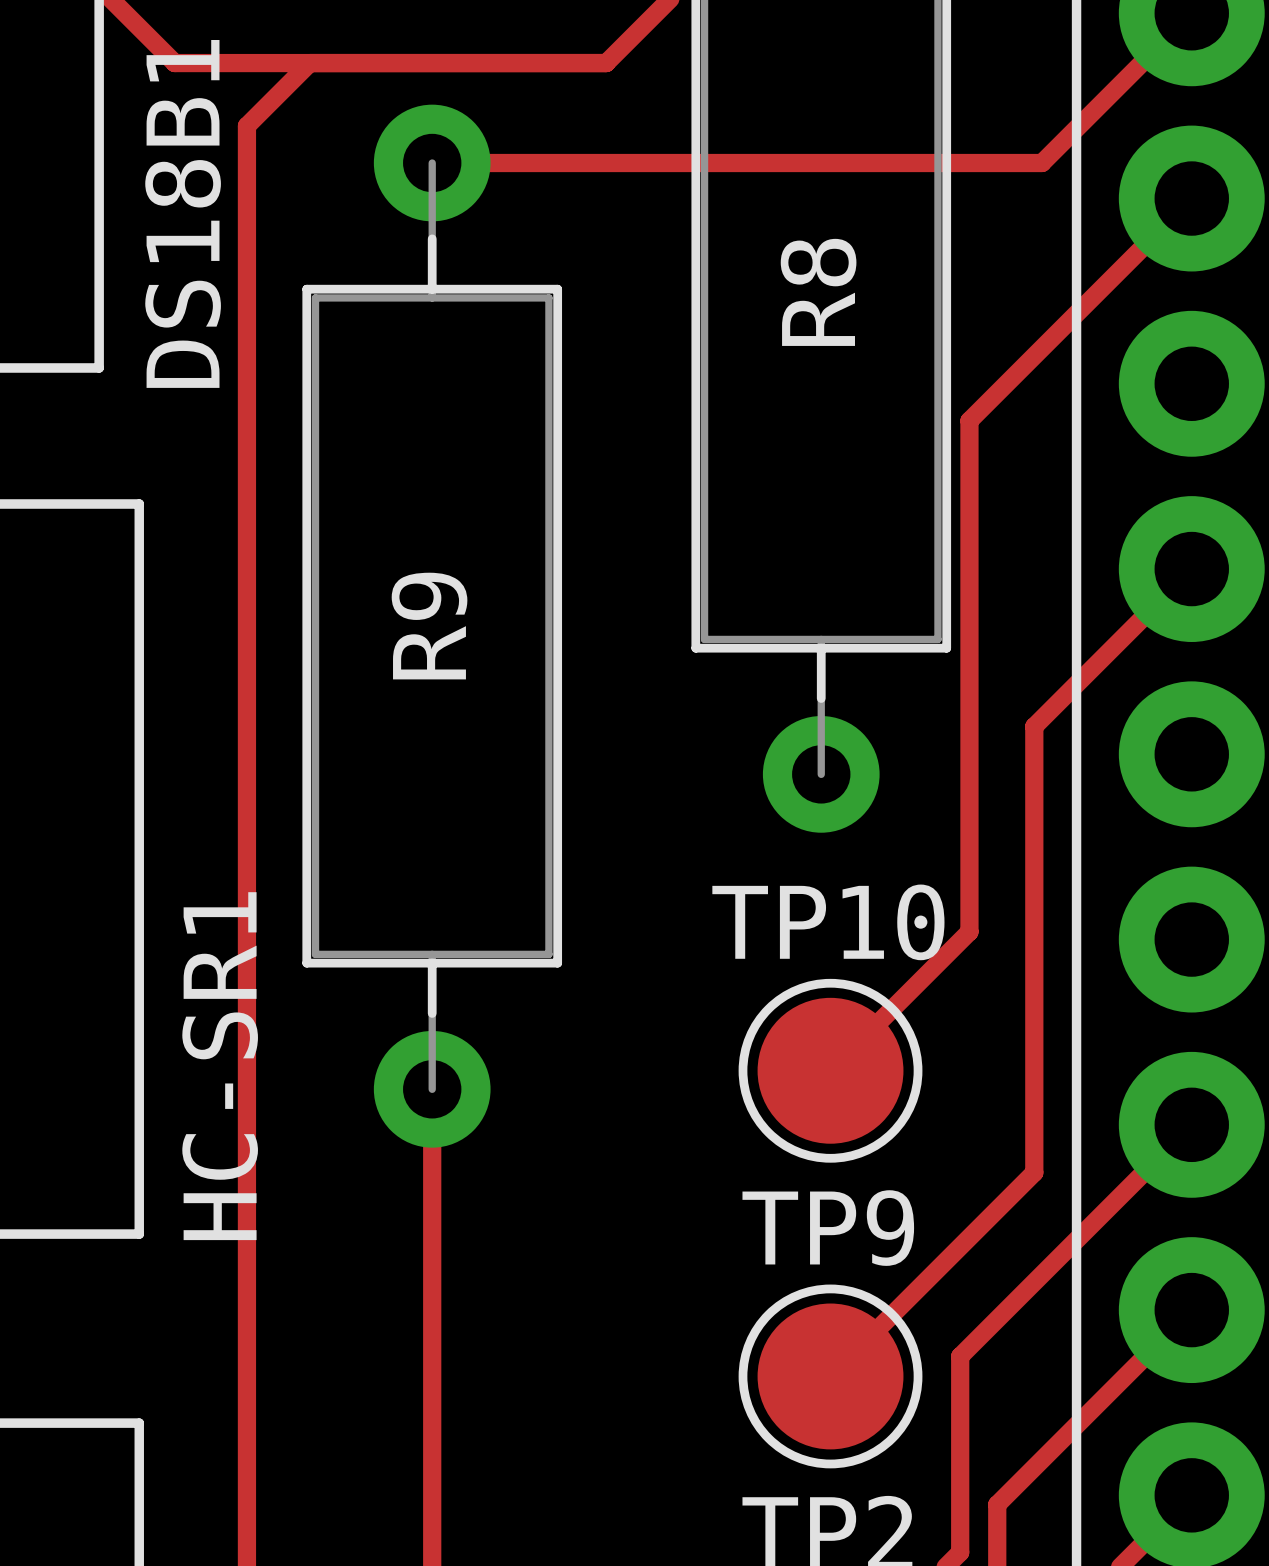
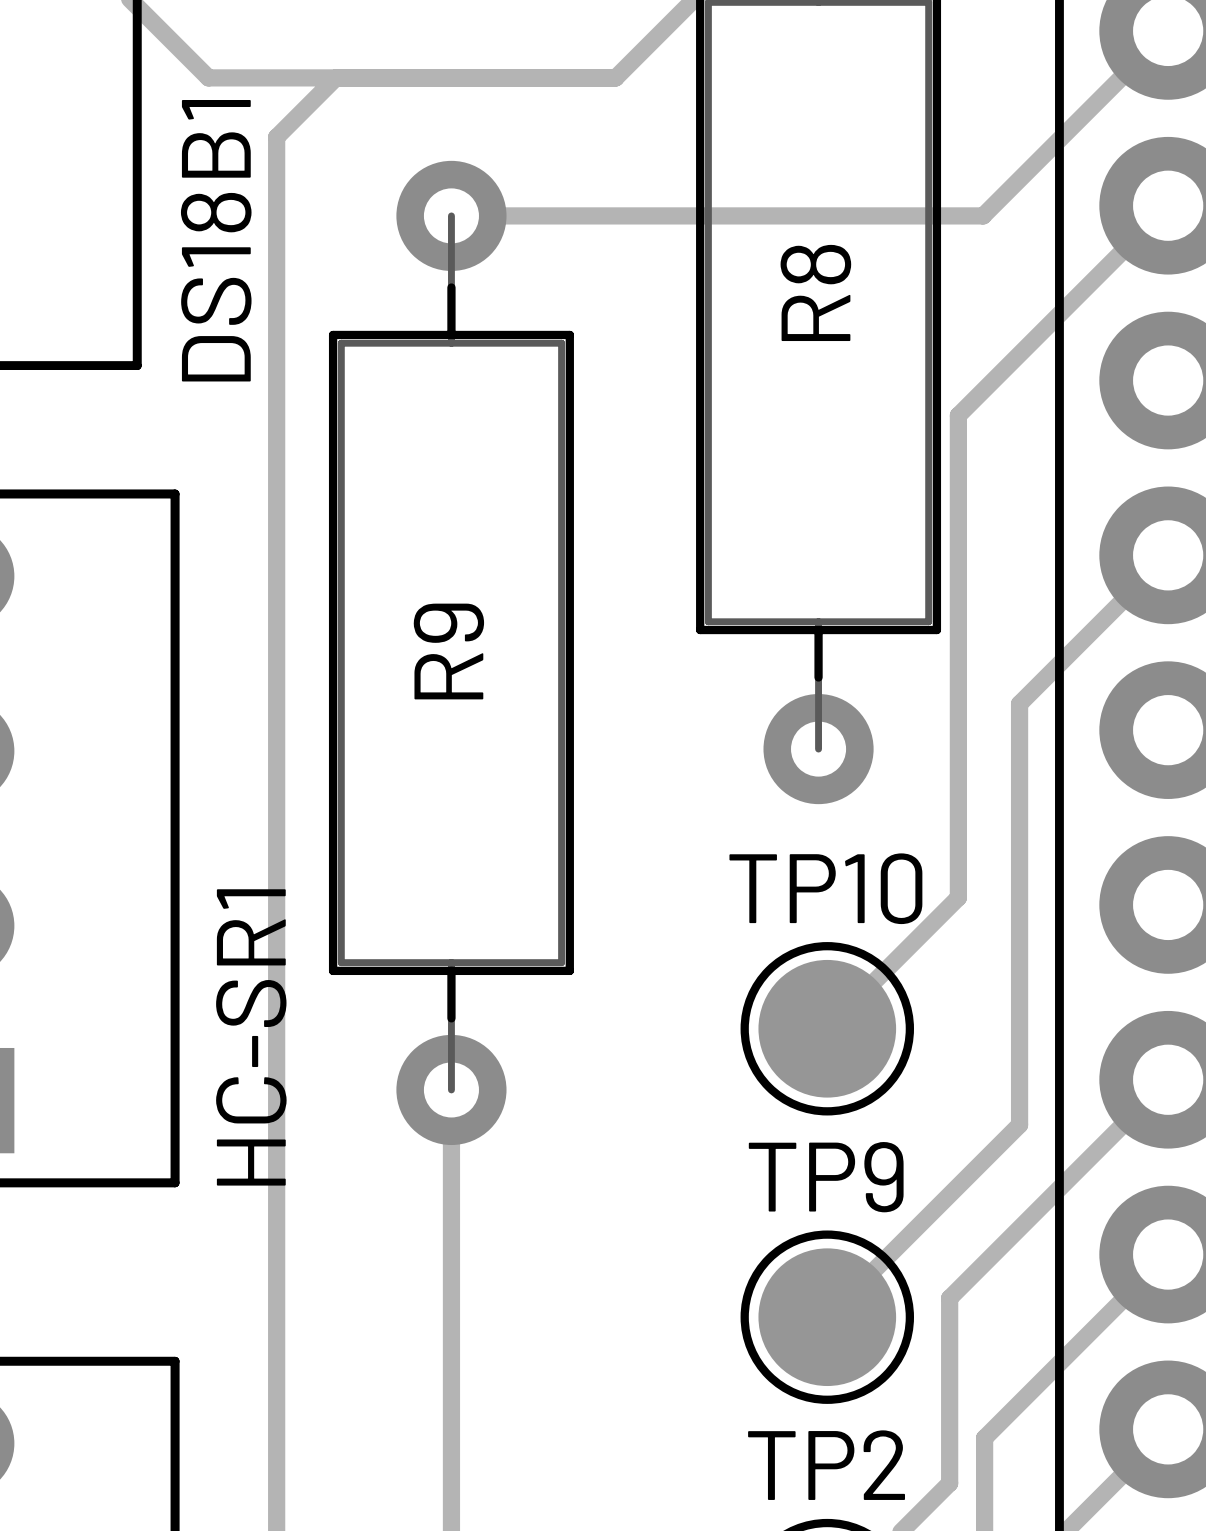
track: (432, 163) (1042, 163) -> (451, 215) (983, 215) (1026, 172)
R9 position: (432, 626) -> (451, 652)

